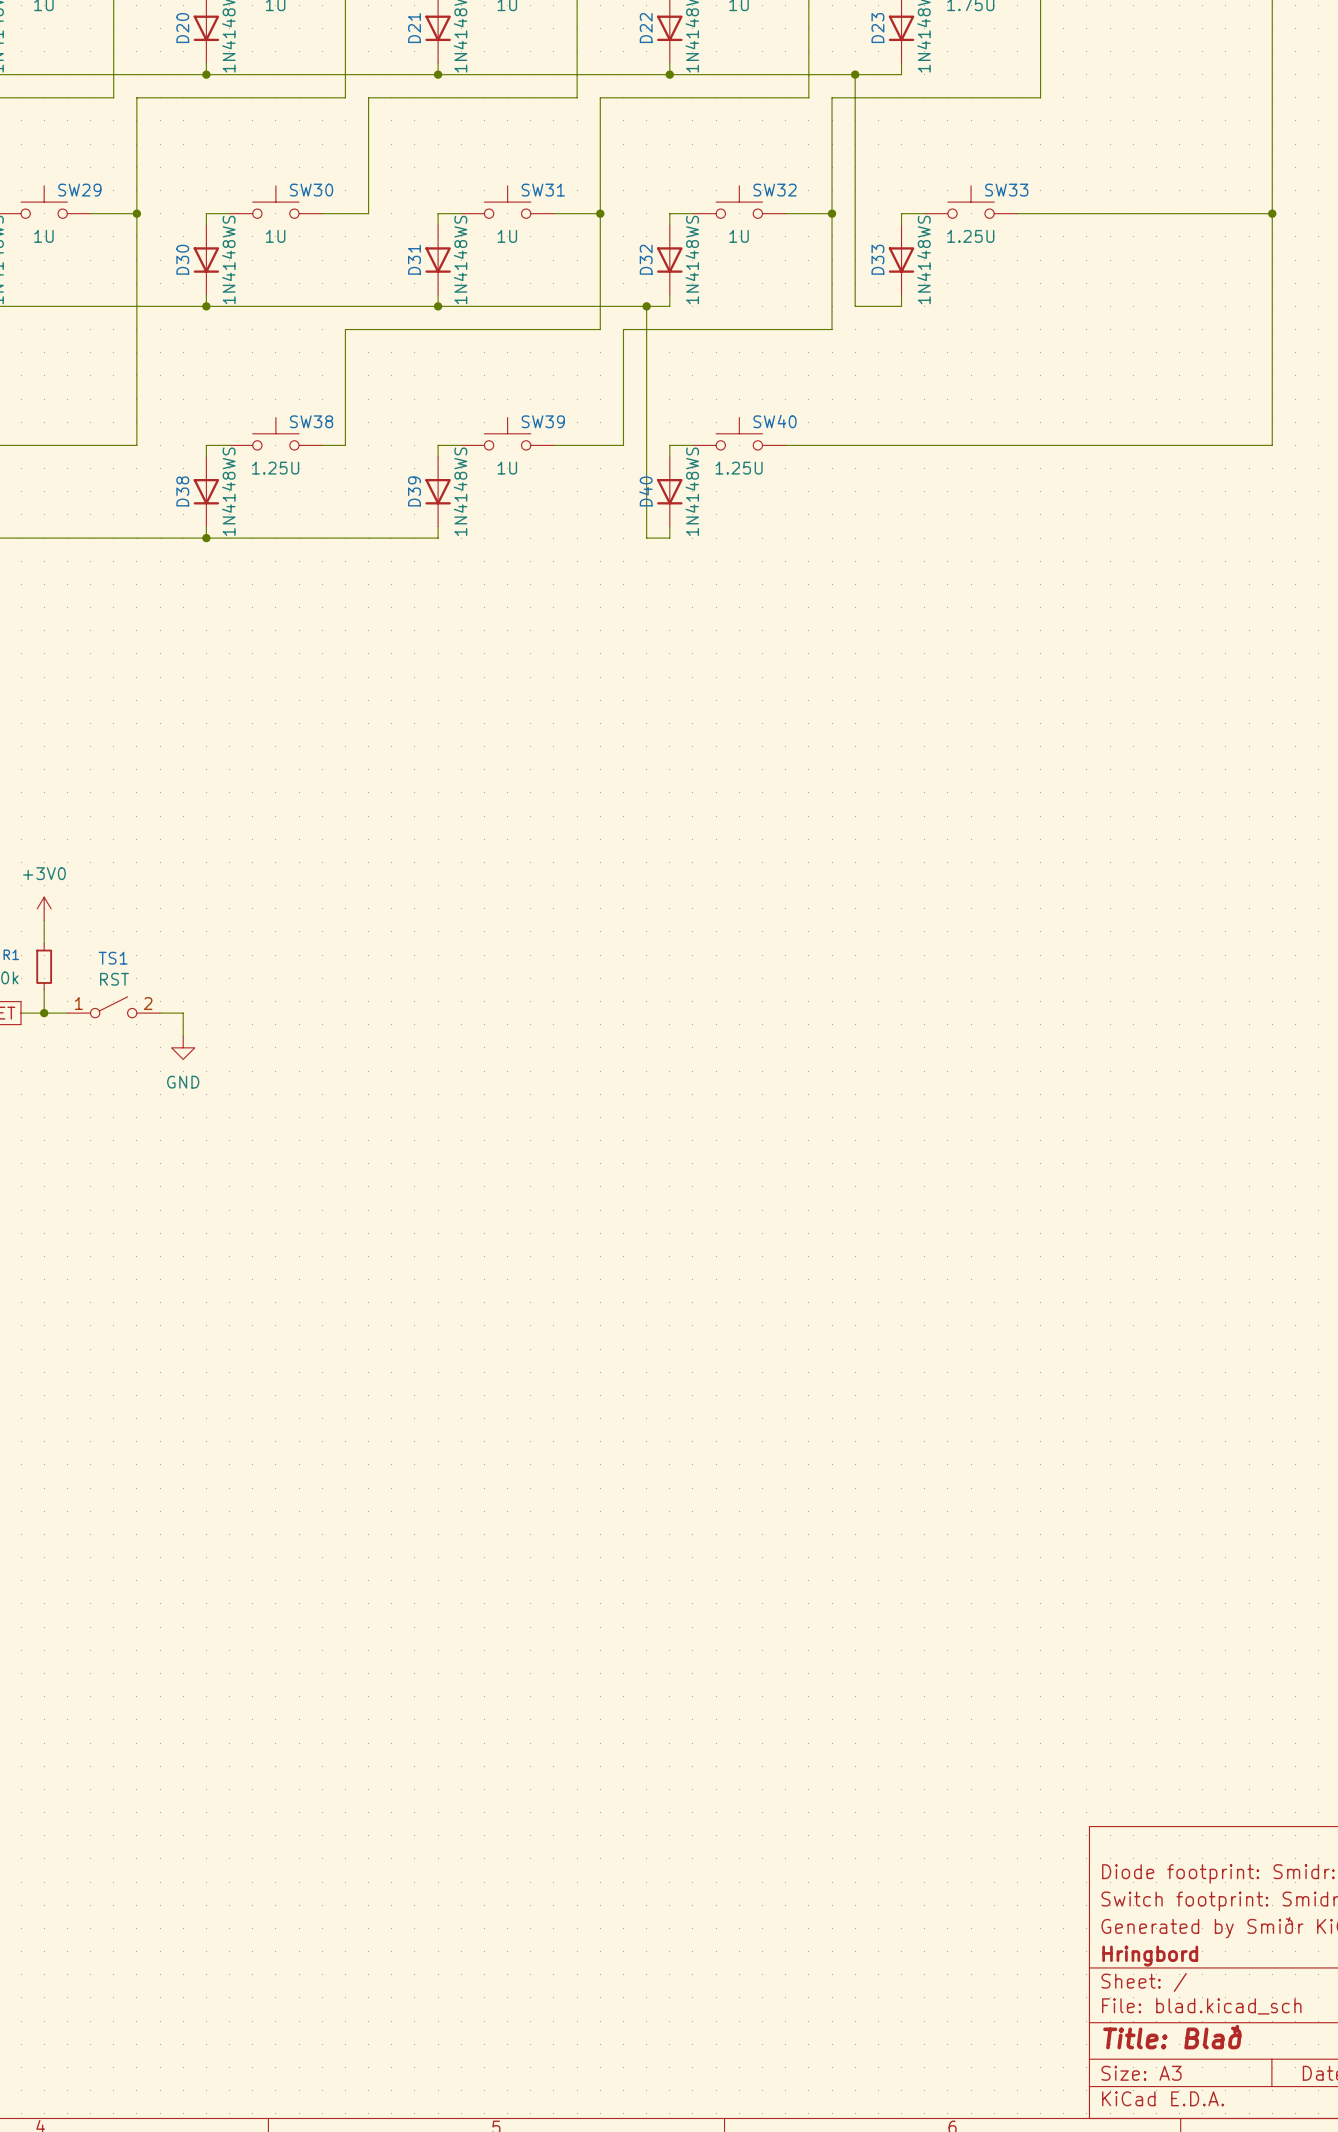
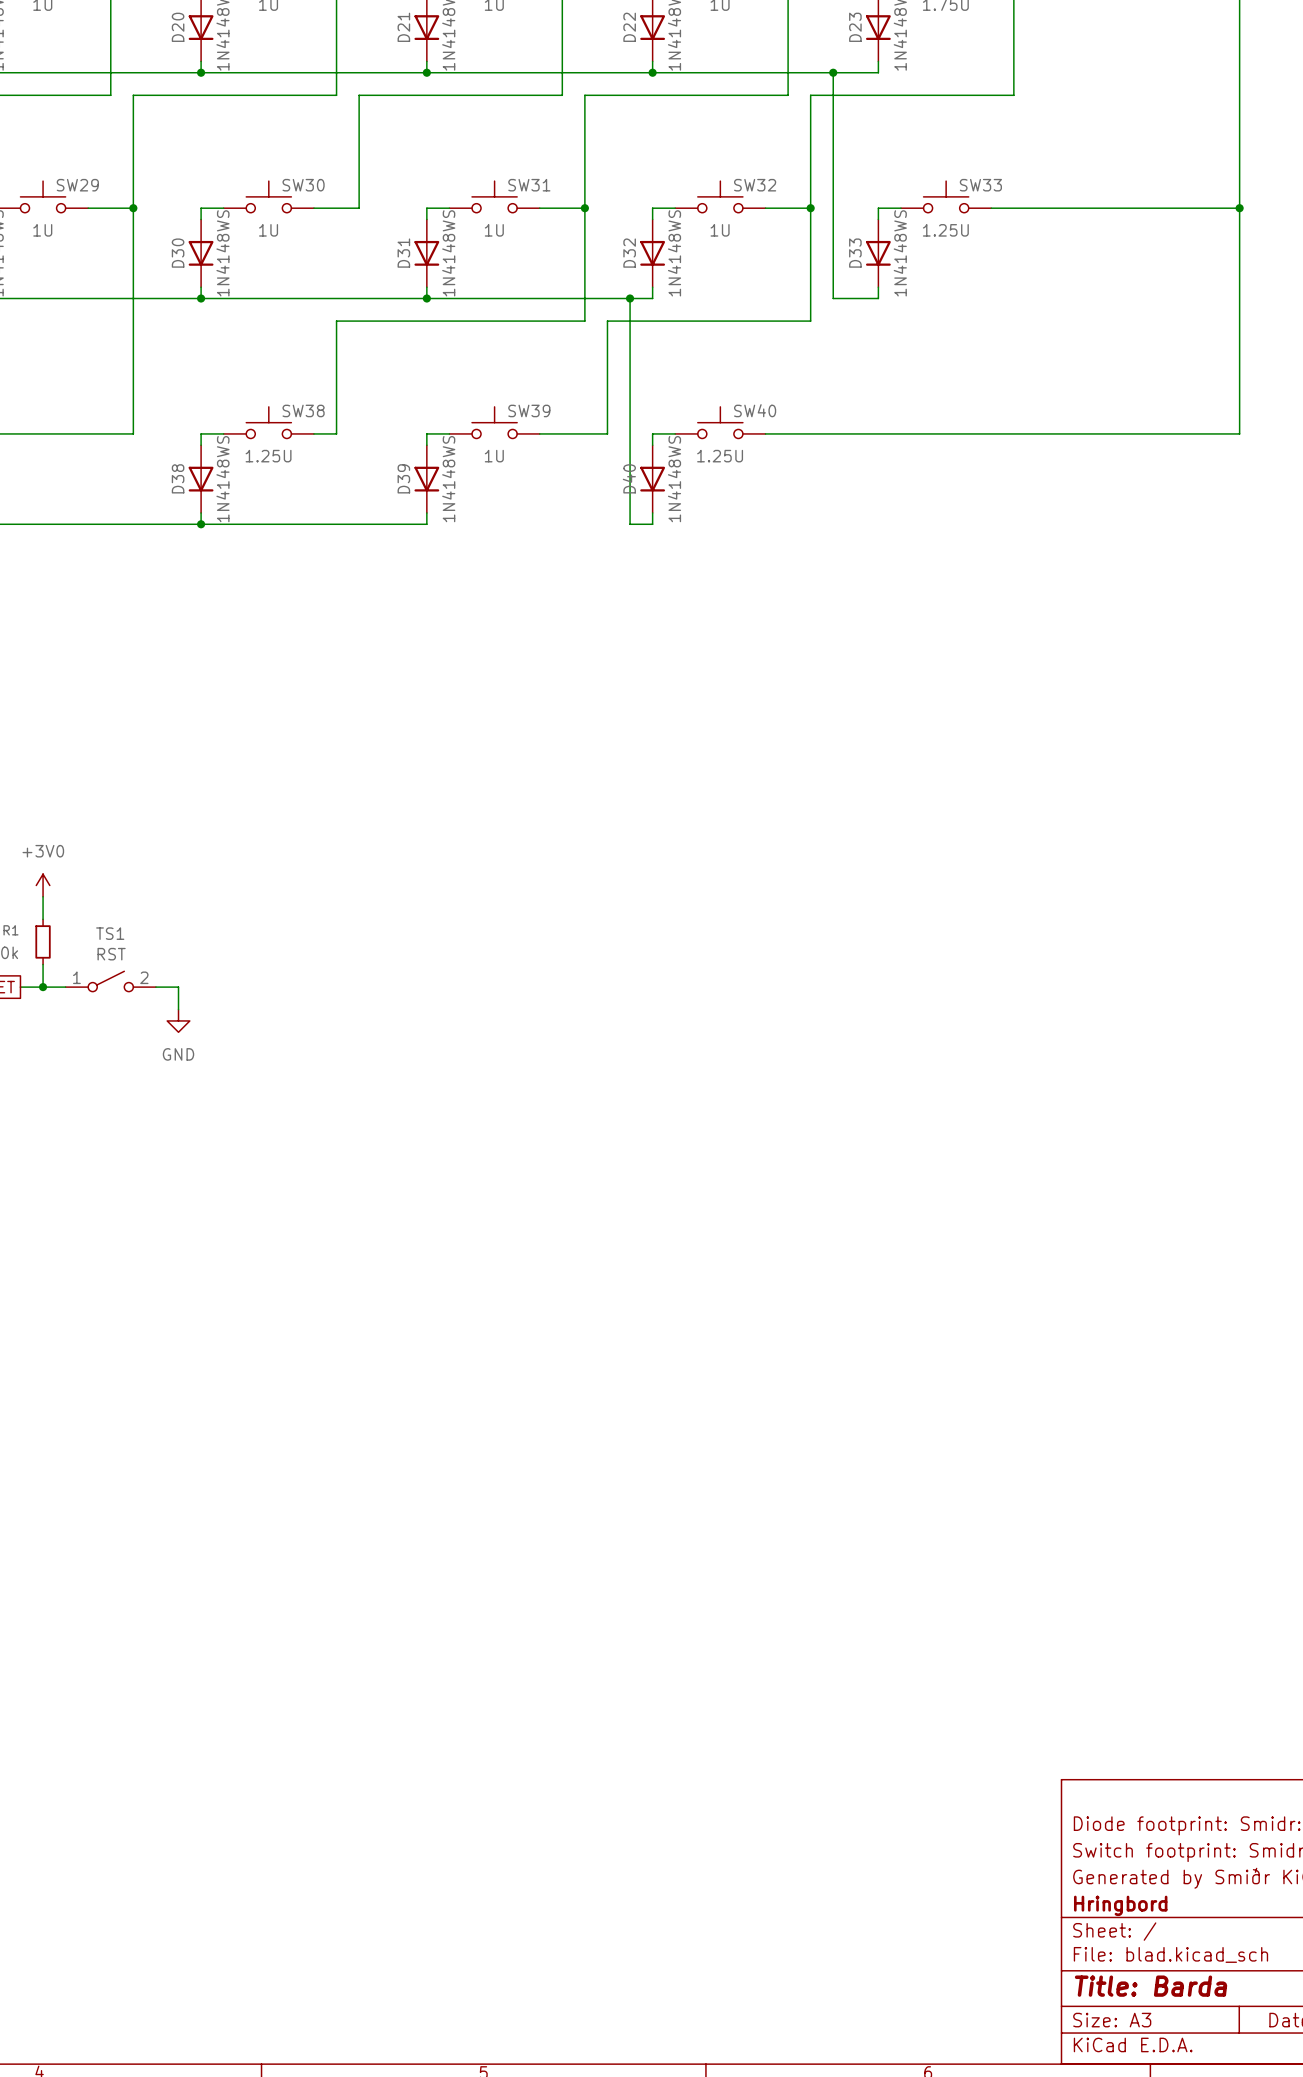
title block: Title: Blað (1172, 2037) -> Title: Barda (1151, 1986)

